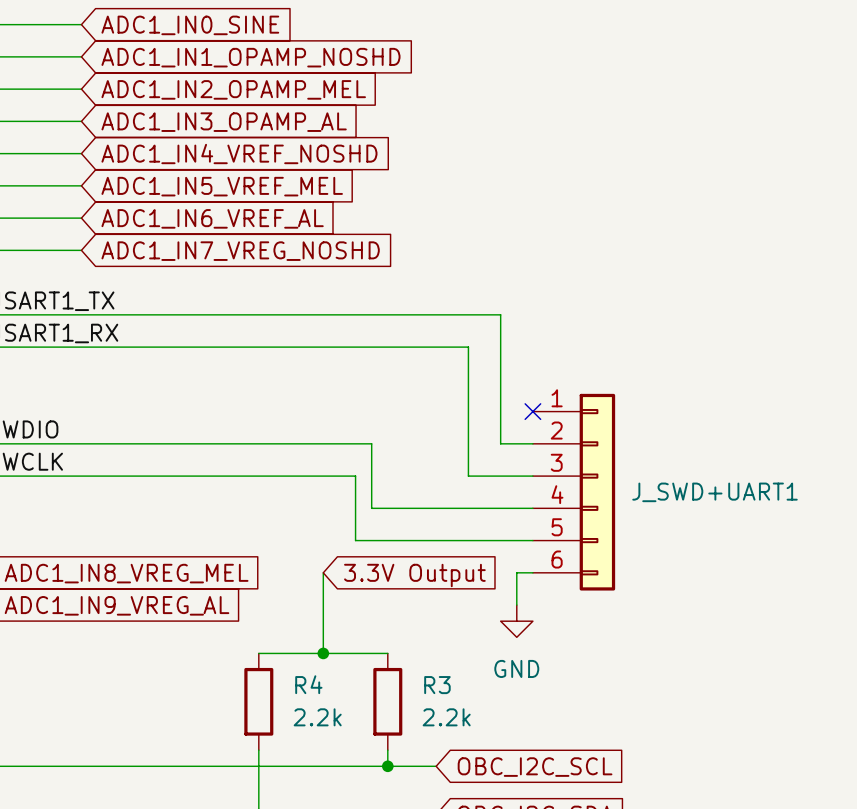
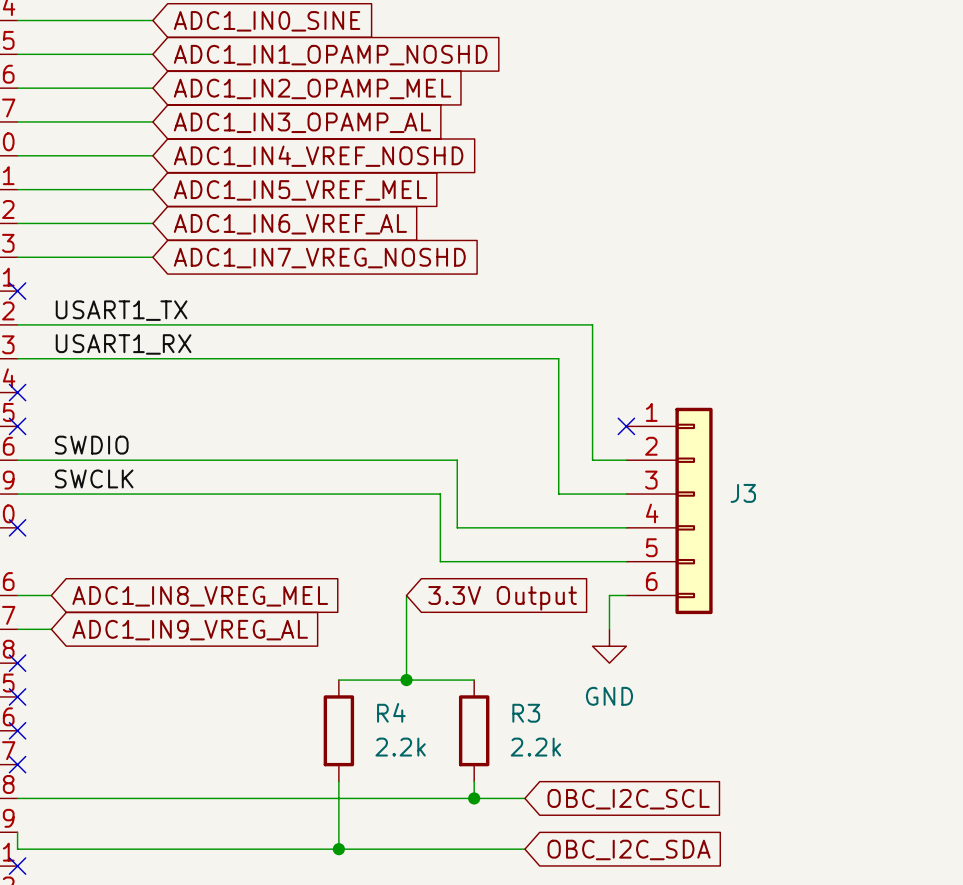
J_SWD+UART1 name: J_SWD+UART1 (714, 492) -> J3 (743, 493)

